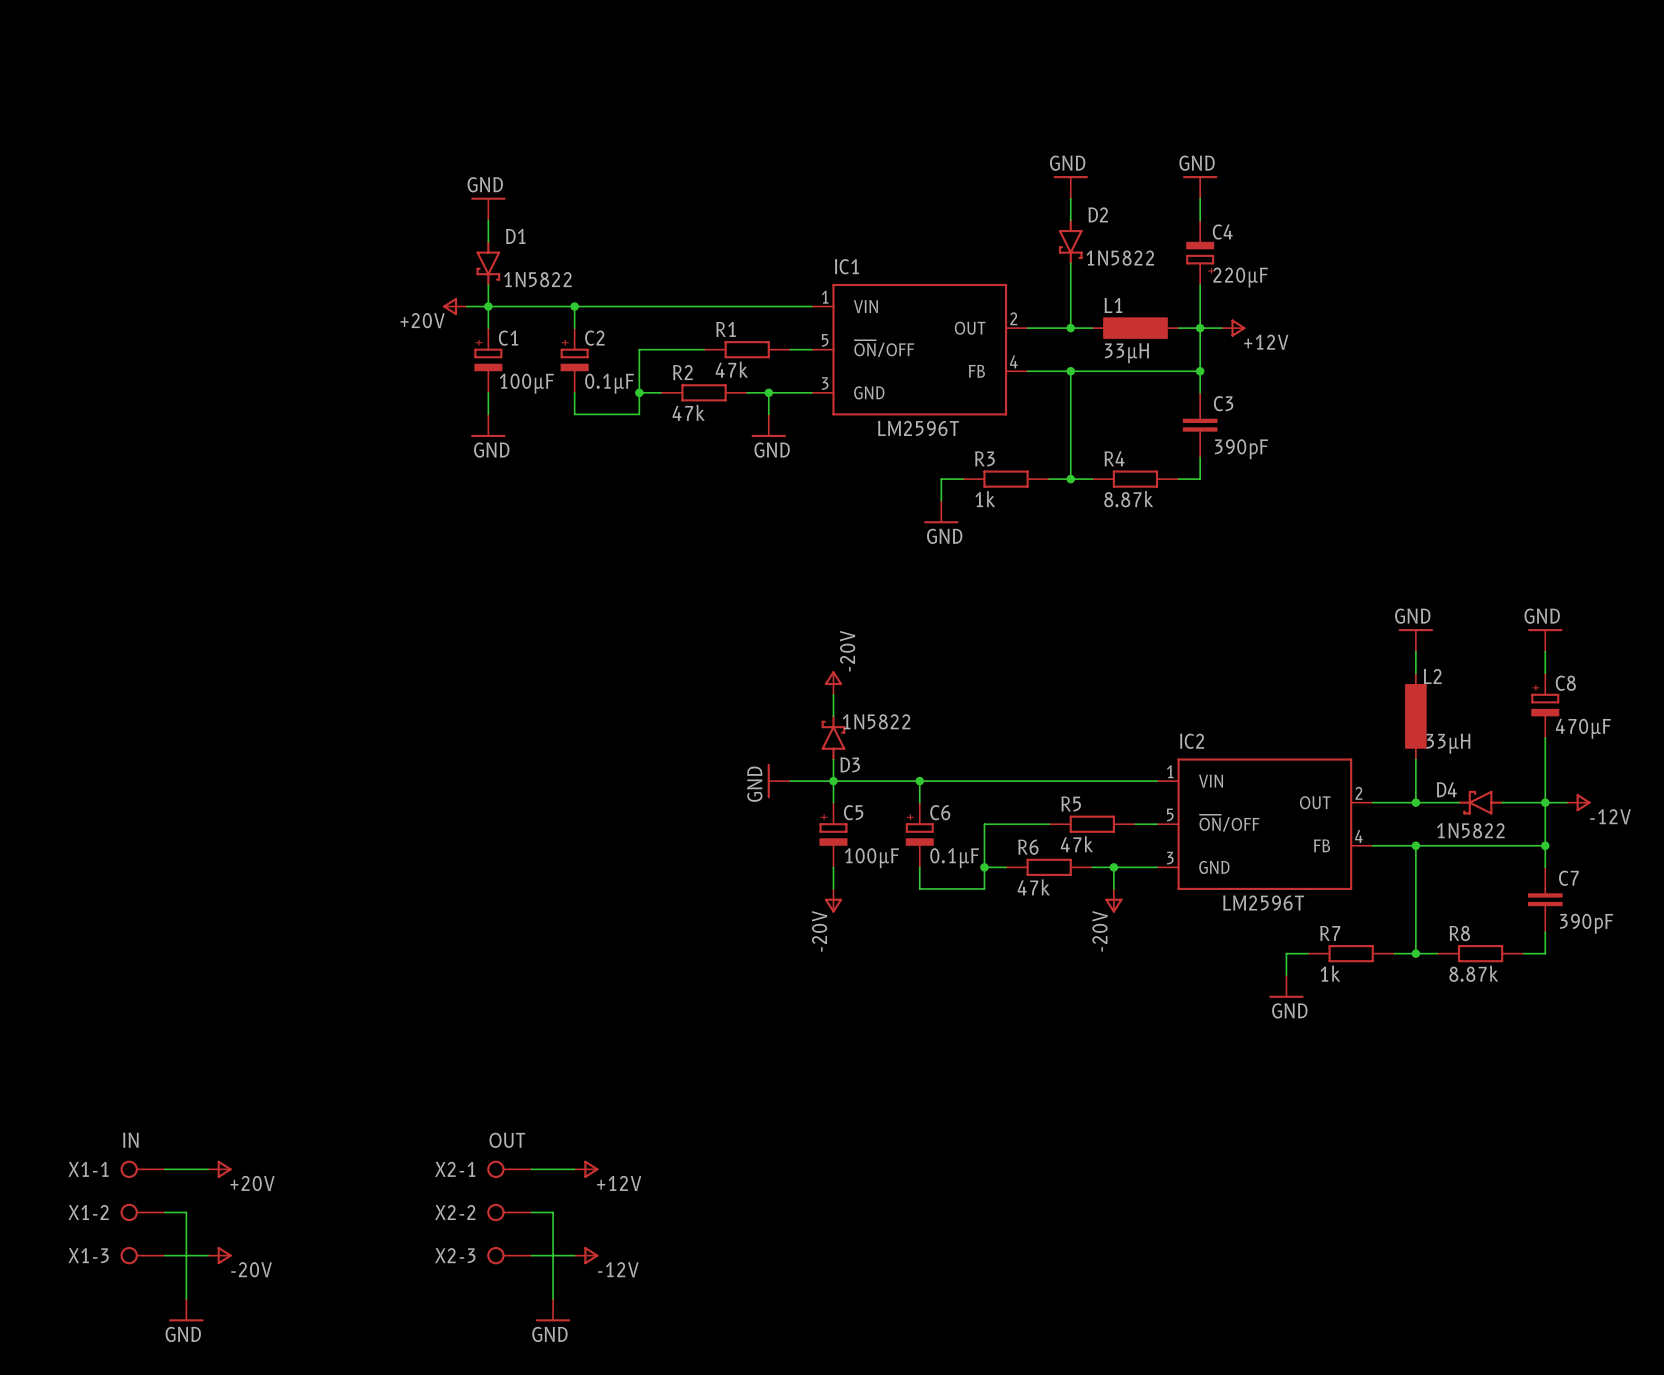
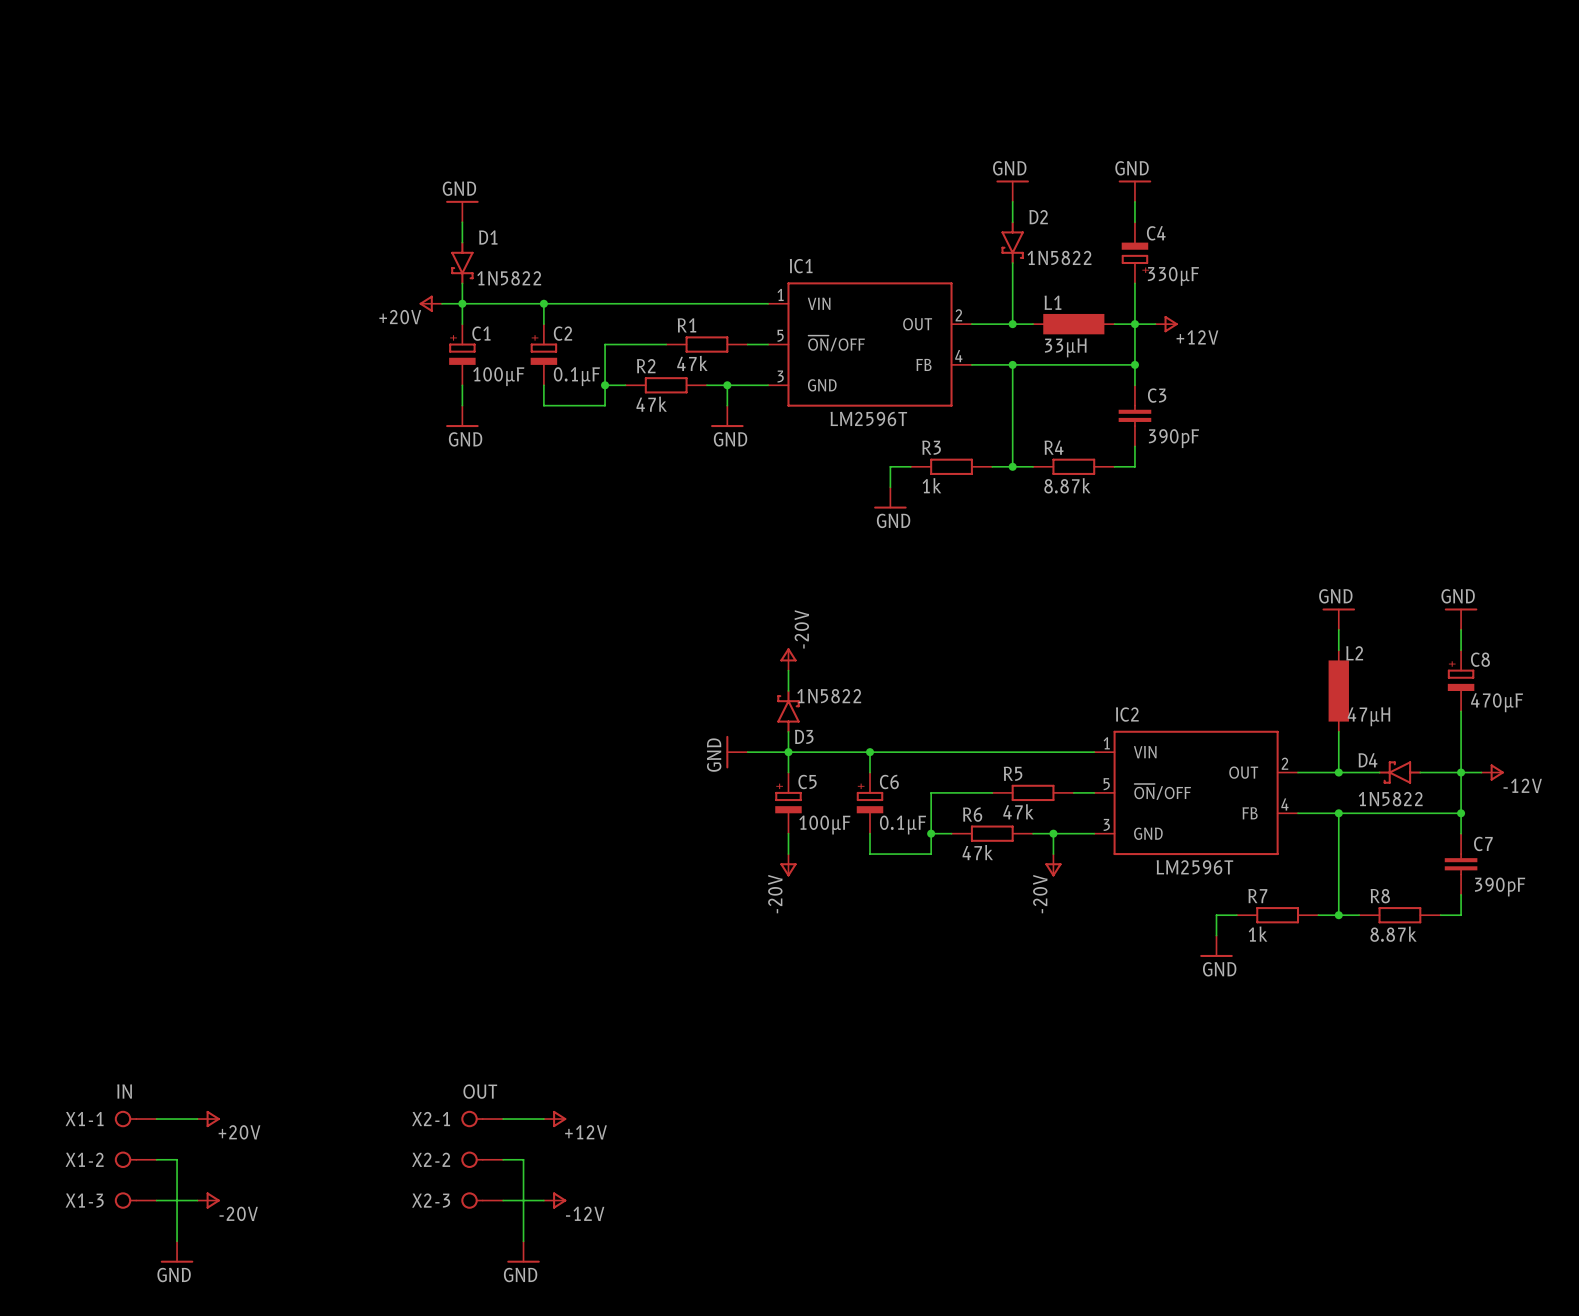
C4 value: 220µF (1240, 277) -> 330µF (1173, 276)
L2 value: 33µH (1448, 743) -> 47µH (1368, 716)

